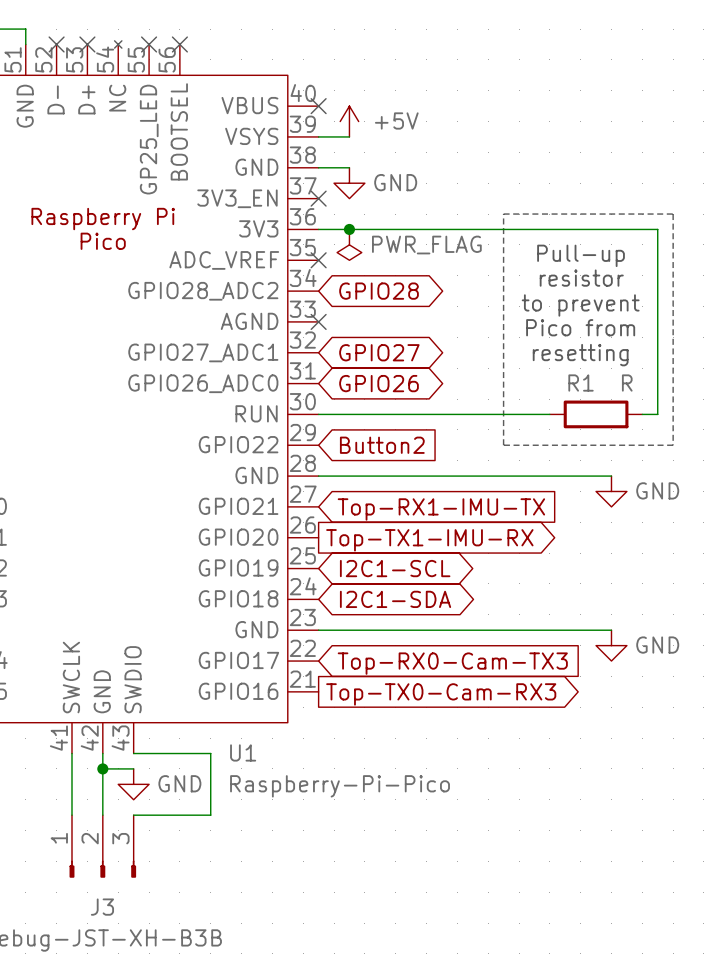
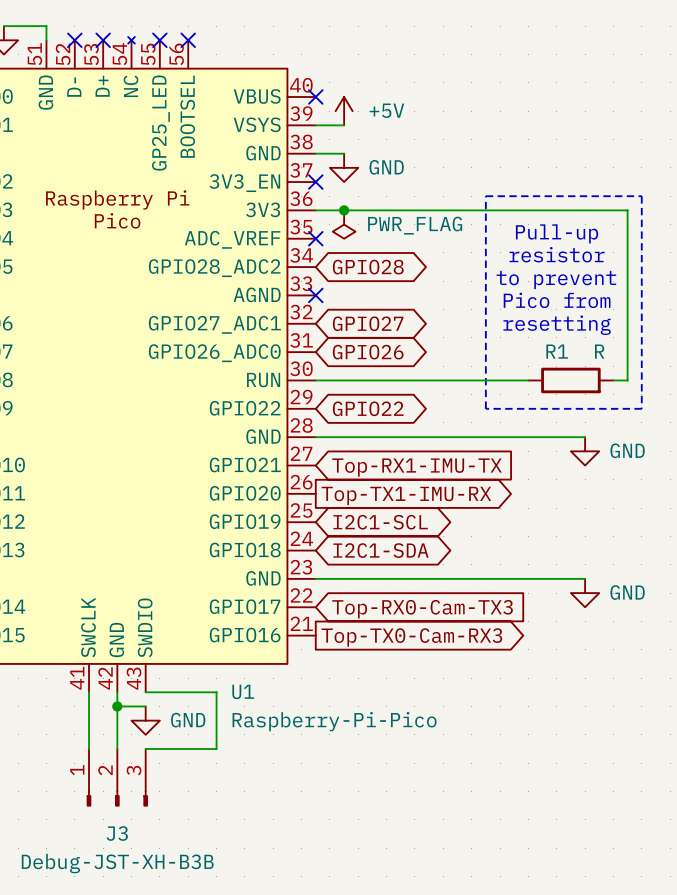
global label shape: input (382, 445) -> bidirectional (368, 408)
global label: Button2 (382, 445) -> GPIO22 (368, 408)

